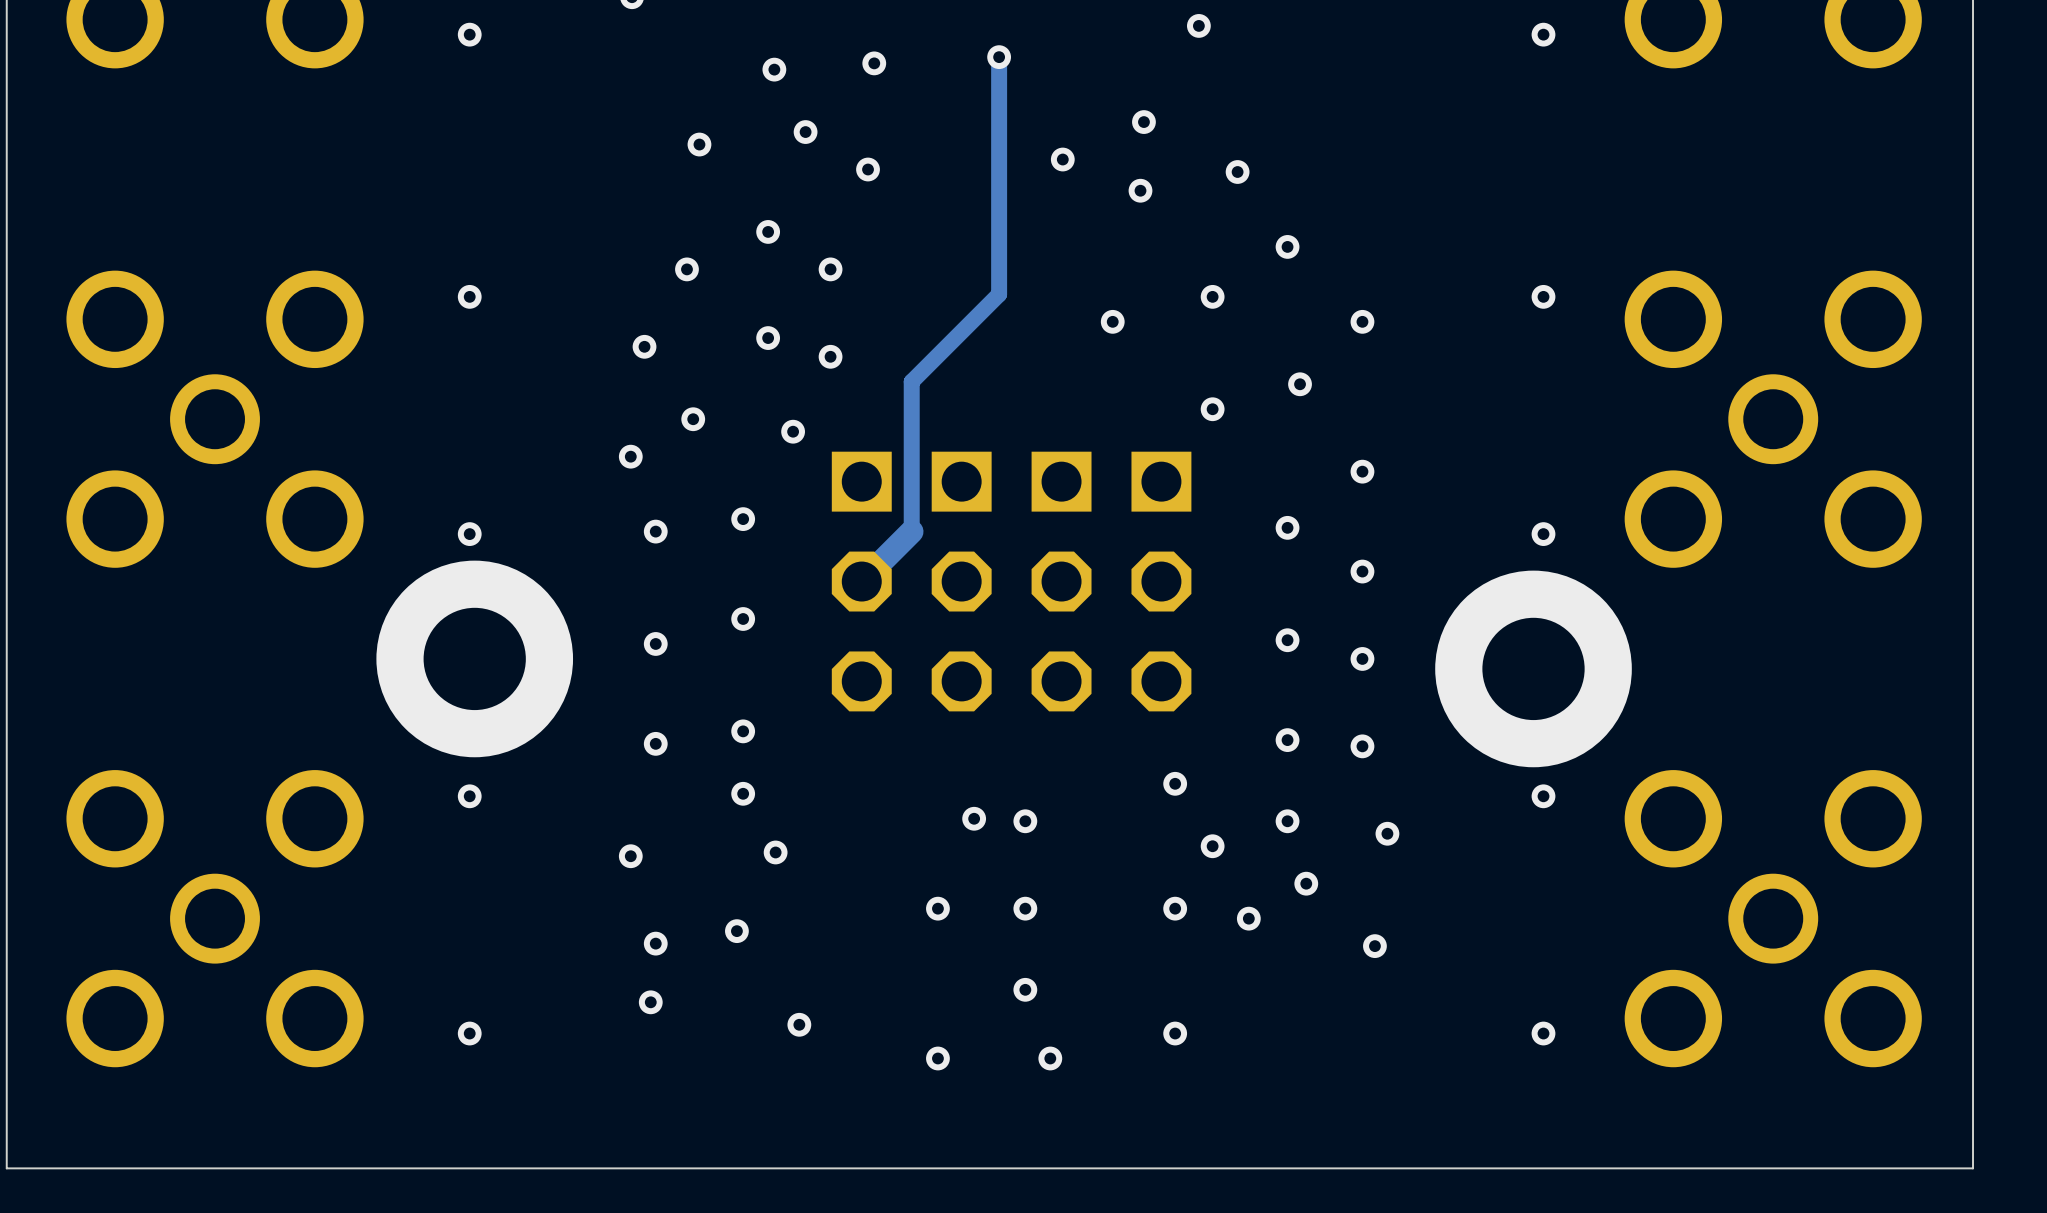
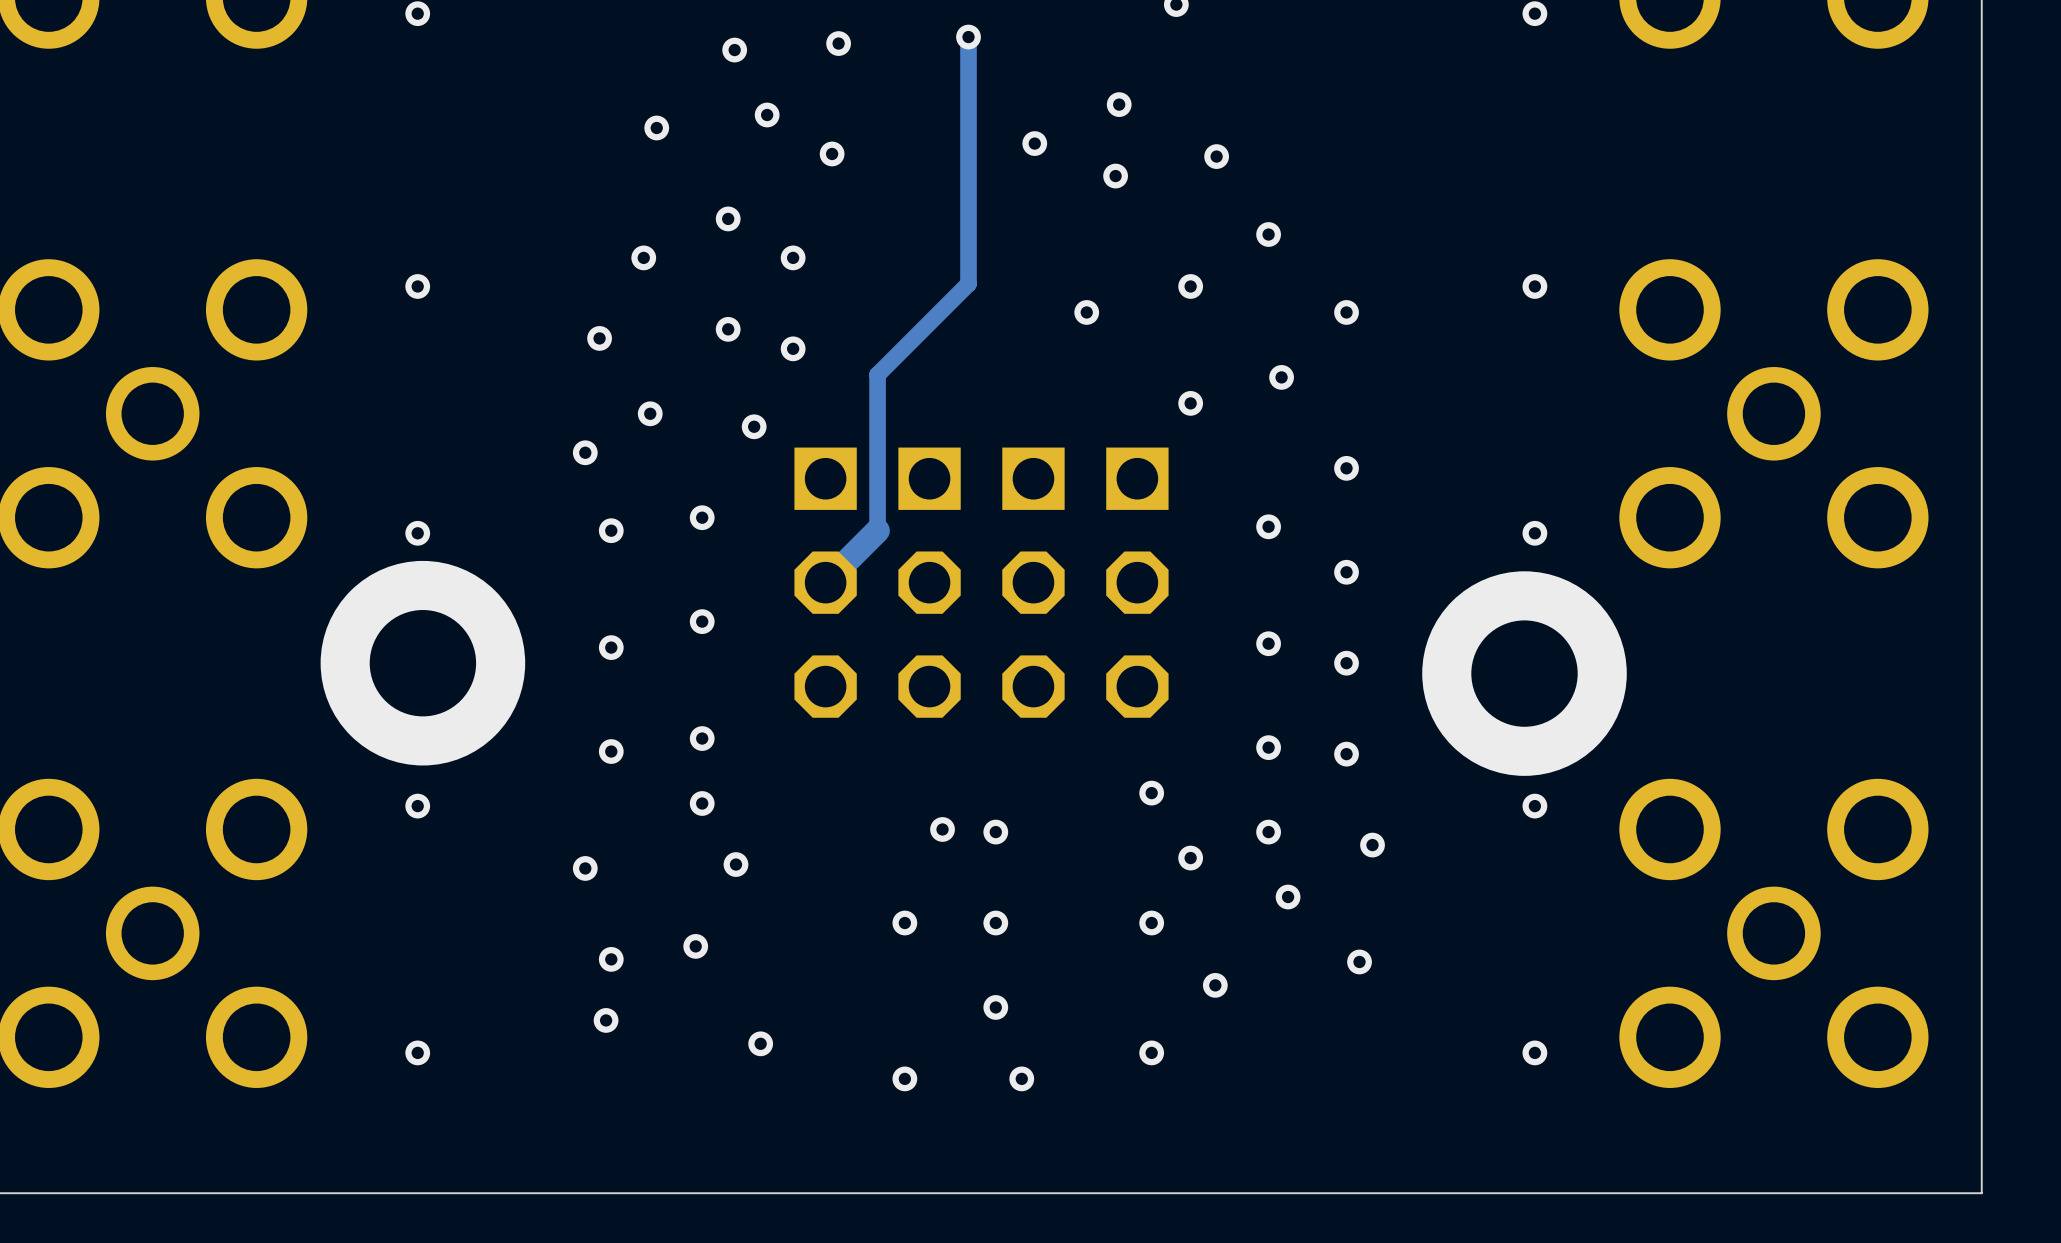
via position: (1248, 918) -> (1215, 985)

